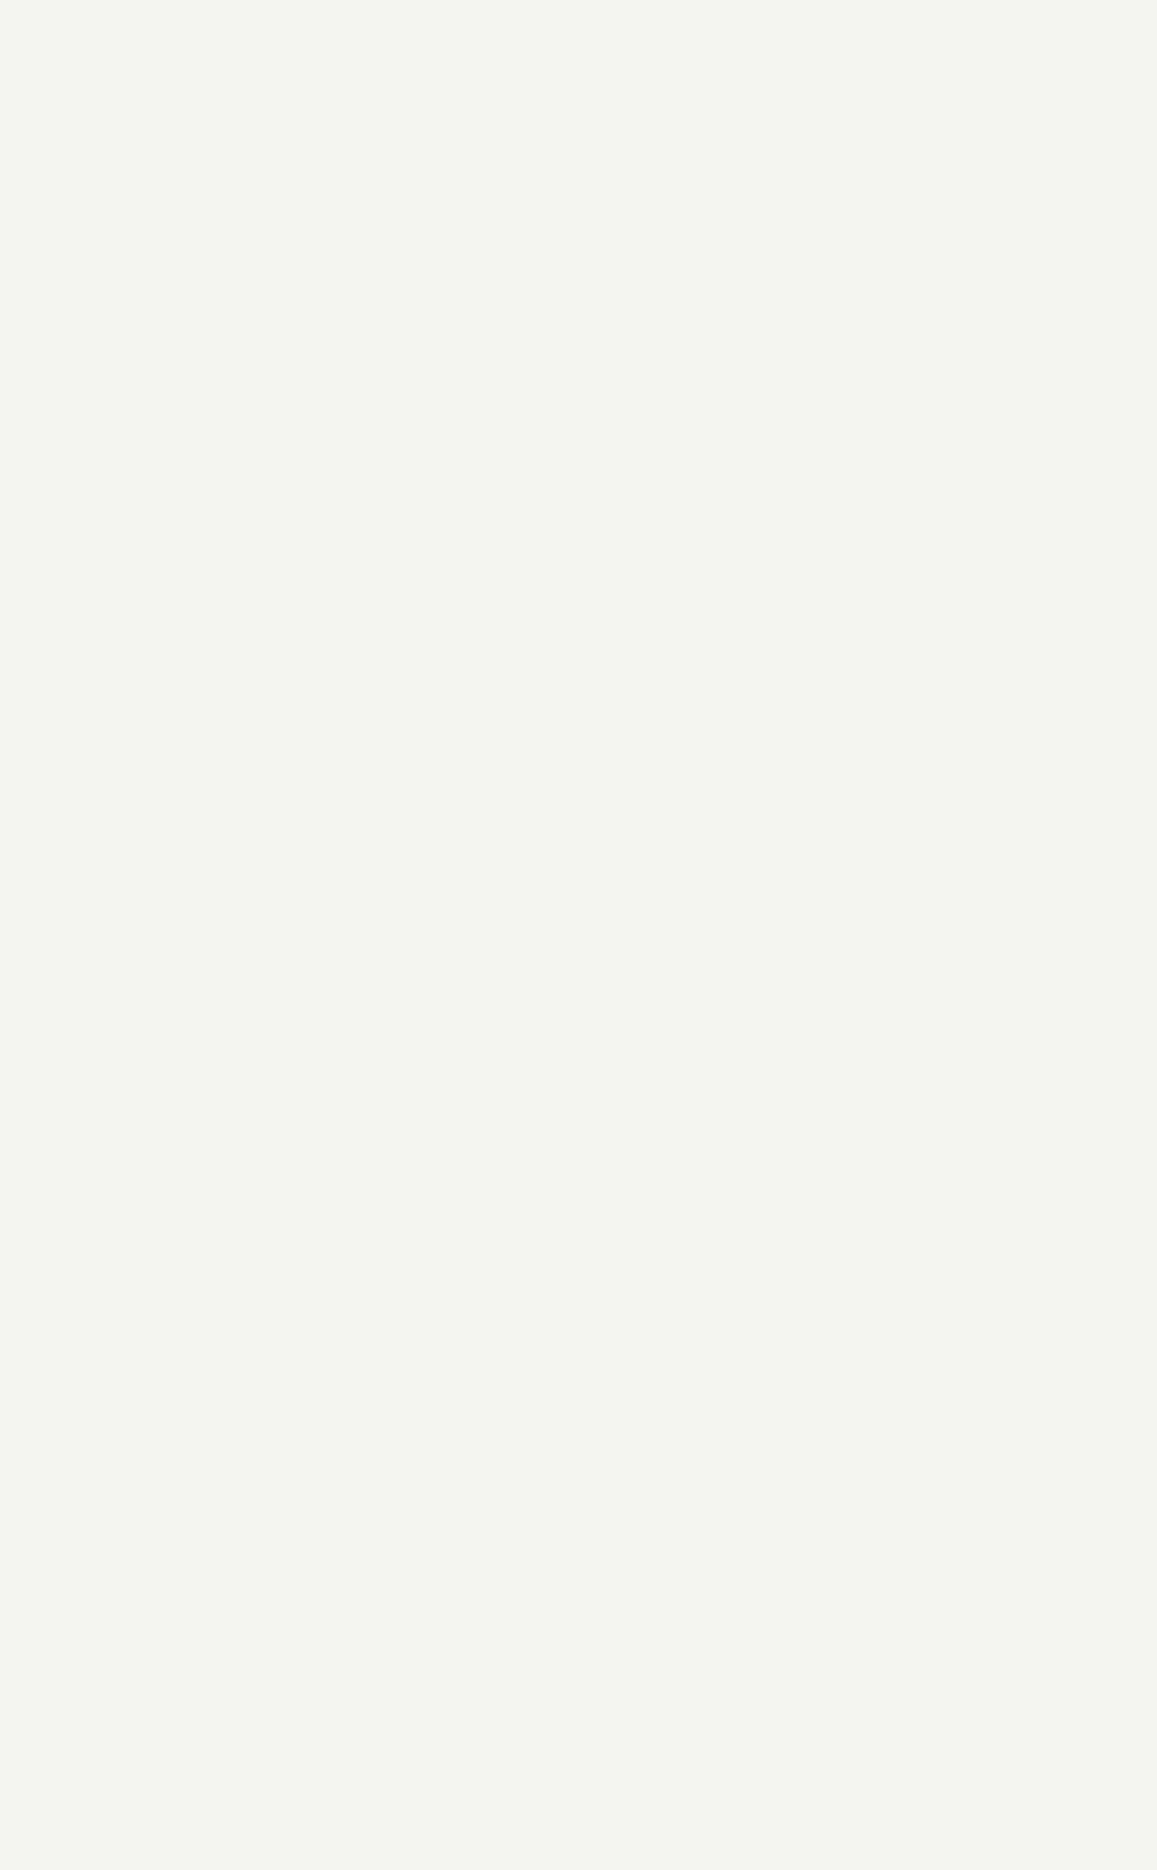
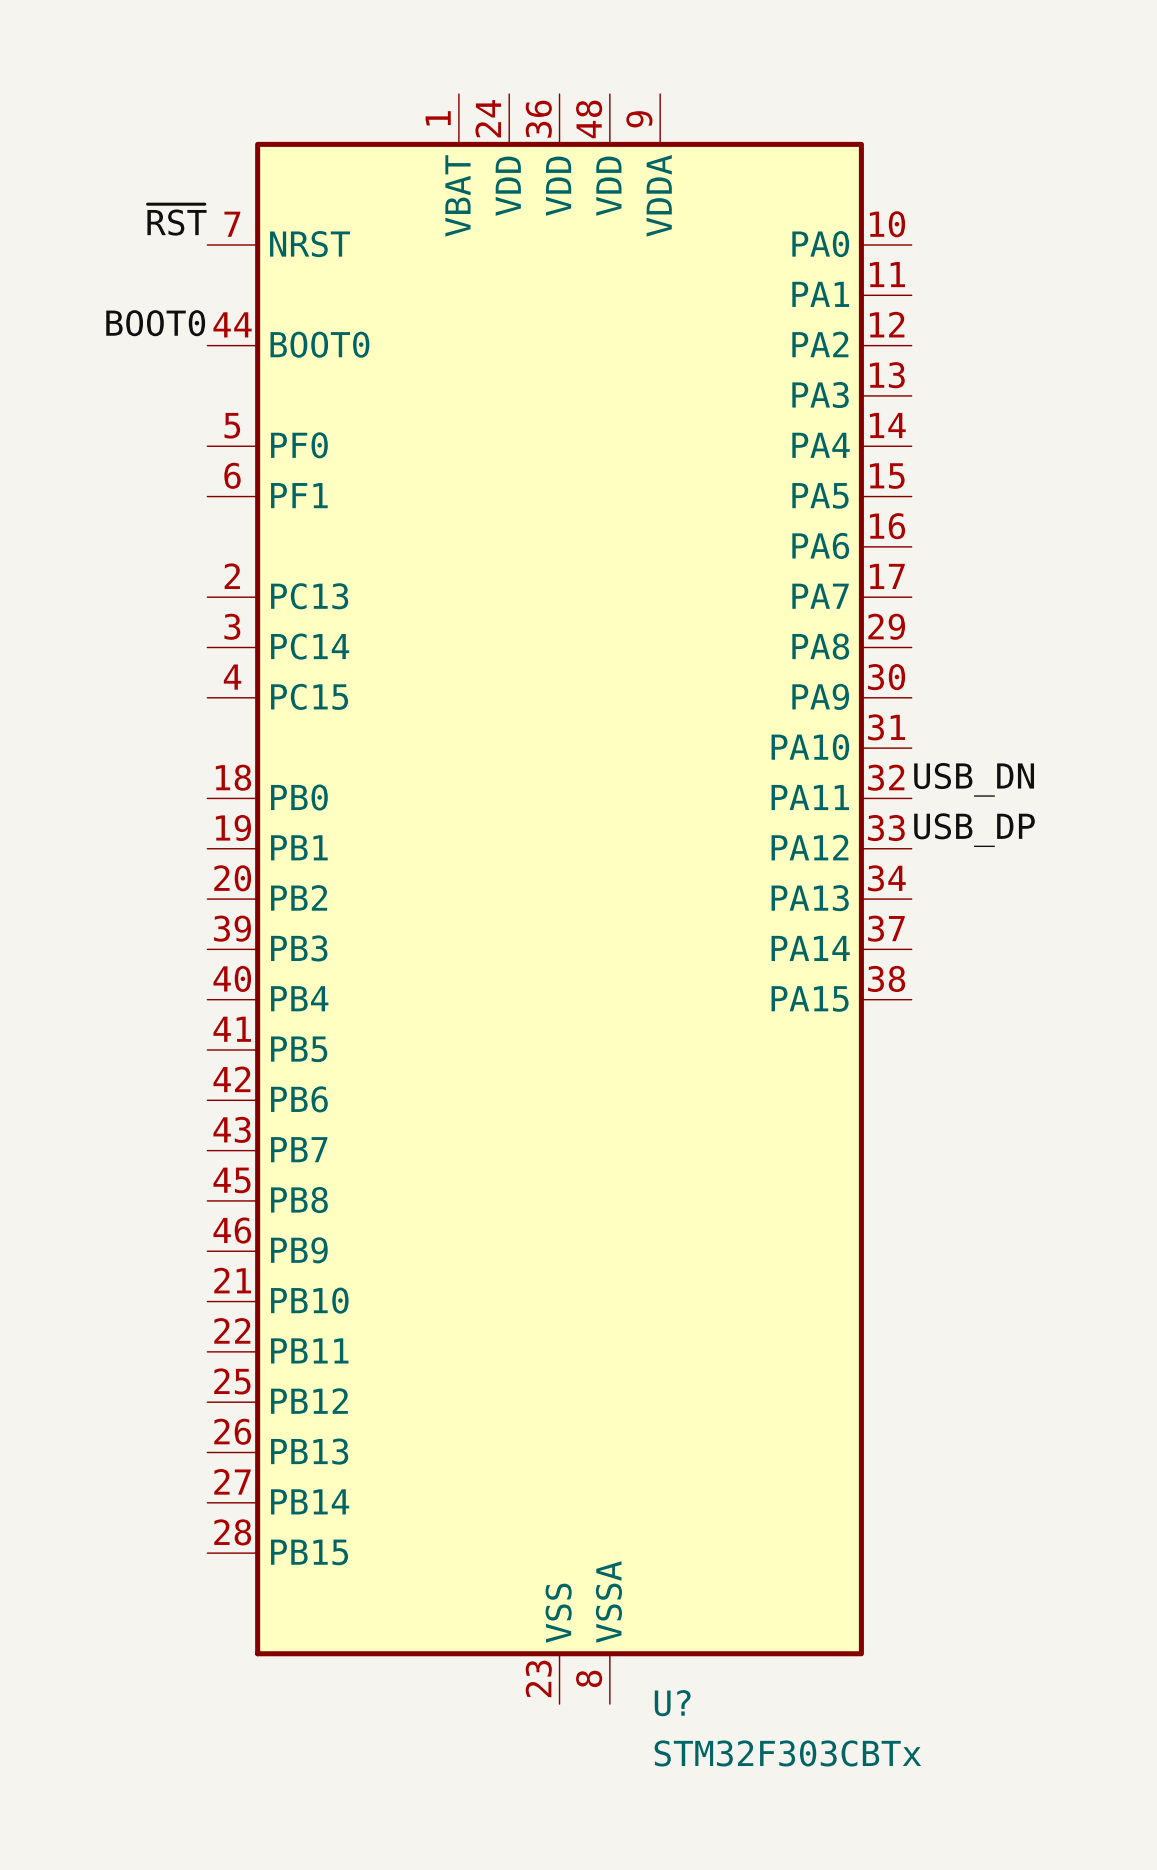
label: none -> ~{RST} (176, 219)
label: none -> BOOT0 (155, 323)
label: none -> USB_DN (974, 779)
label: none -> USB_DP (974, 830)
U?: none -> STM32F303CBTx (559, 899)

